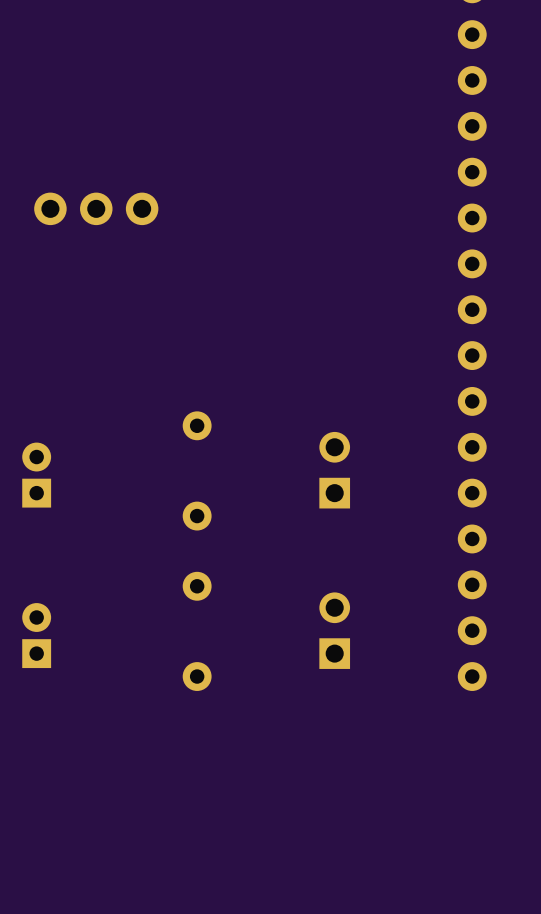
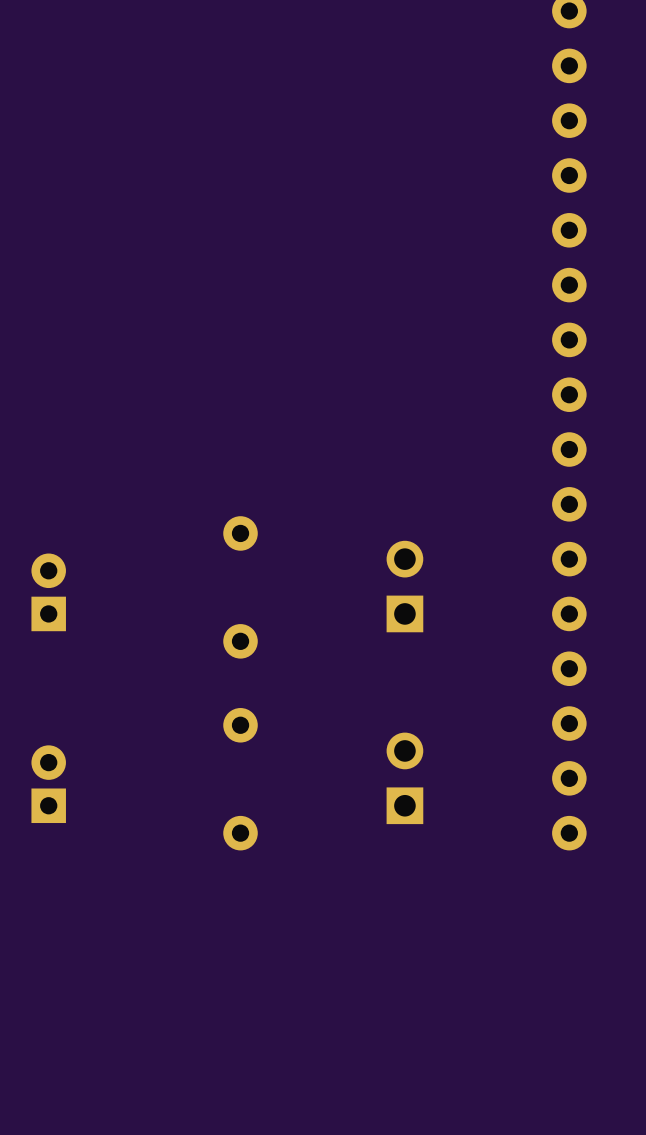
part: (96, 208) -> none

